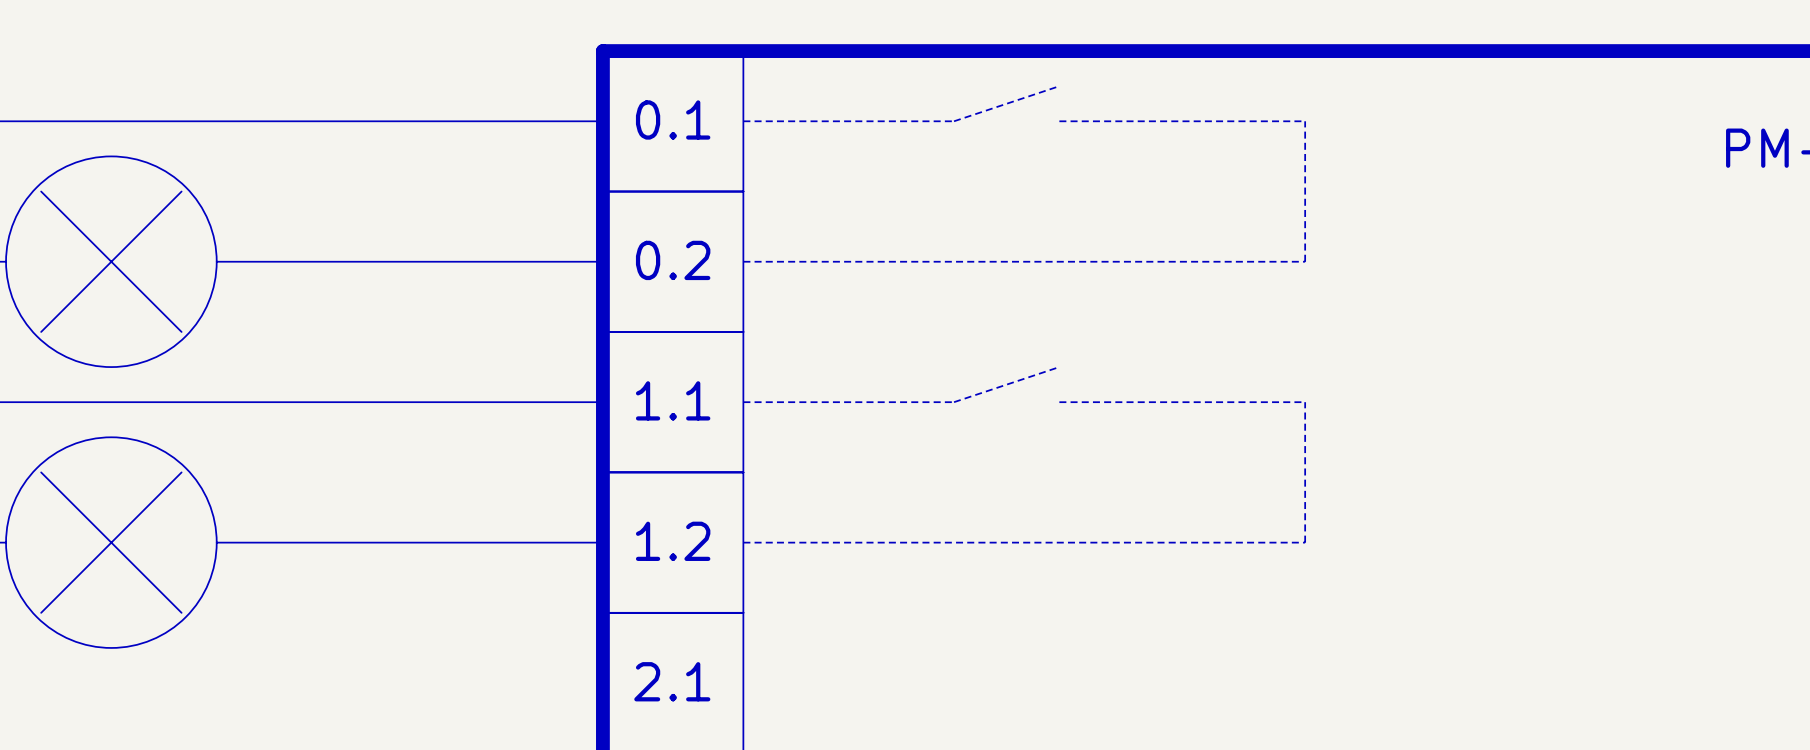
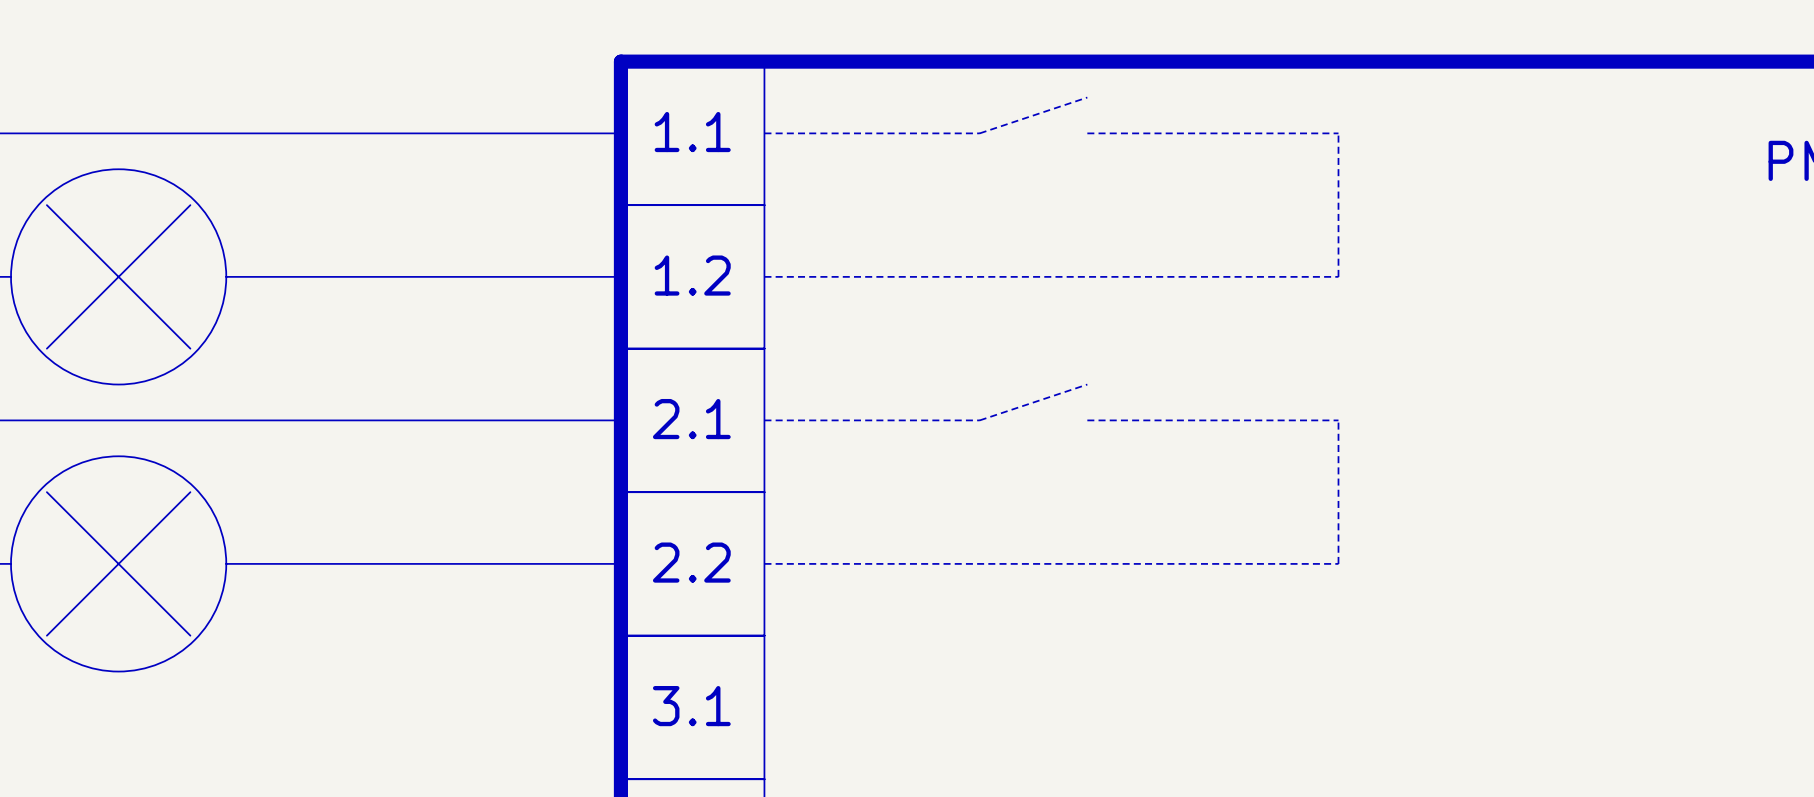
text: 0.1 (673, 119) -> 1.1 (692, 132)
text: 0.2 (673, 260) -> 1.2 (692, 275)
text: 1.1 (673, 400) -> 2.1 (691, 419)
text: 1.2 (673, 541) -> 2.2 (691, 562)
text: 2.1 (672, 681) -> 3.1 (691, 706)

